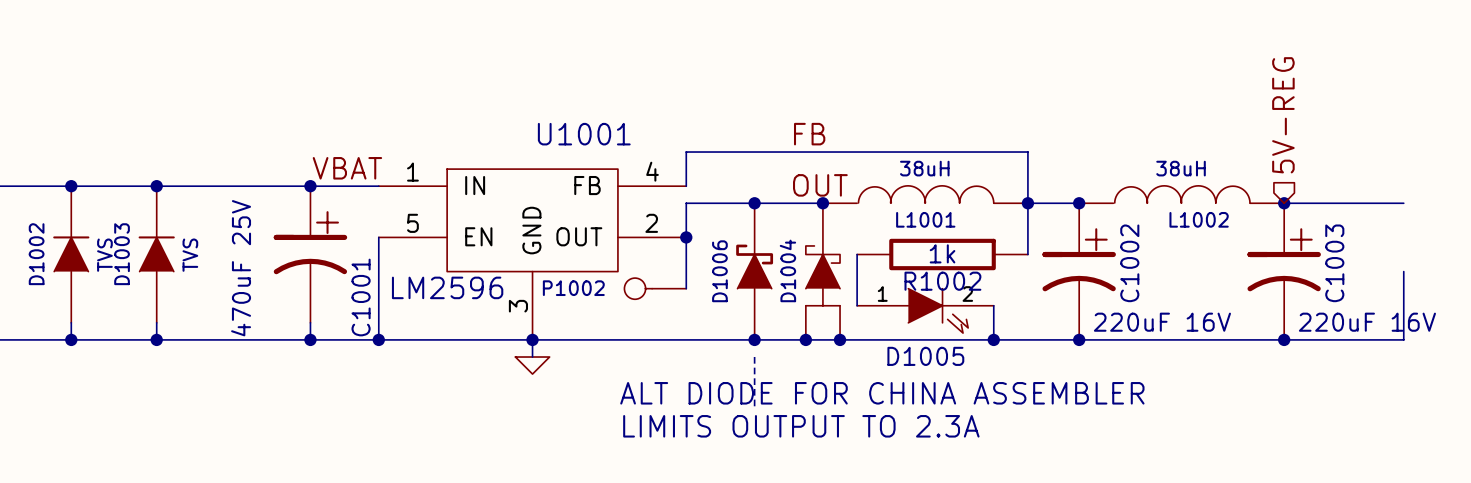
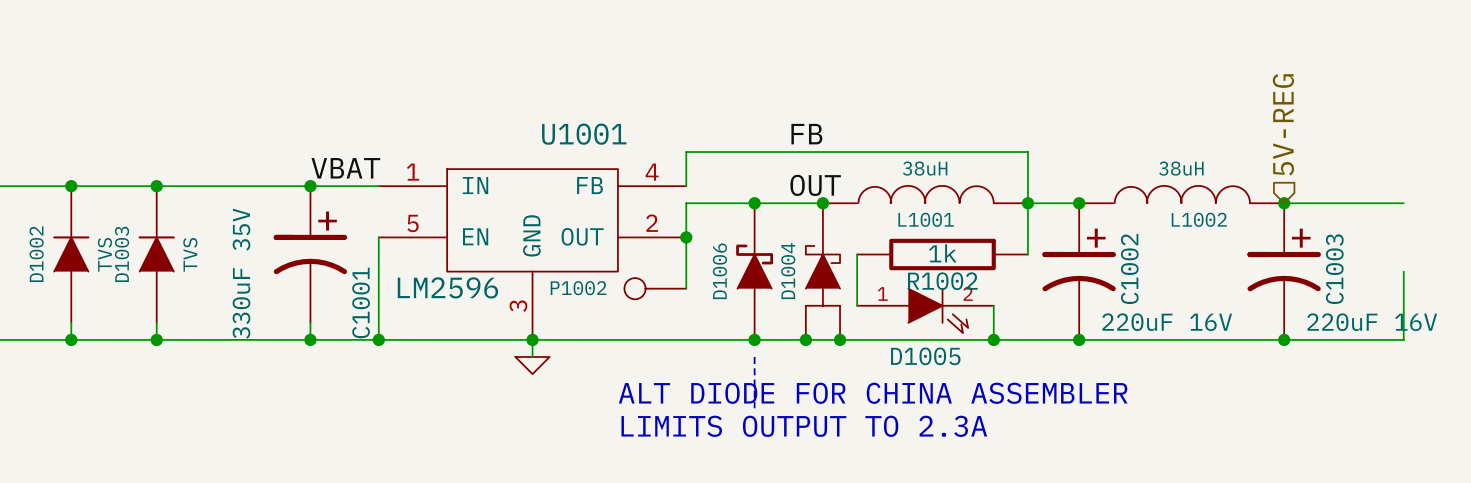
C1001 value: 470uF 25V (241, 268) -> 330uF 35V (241, 273)

